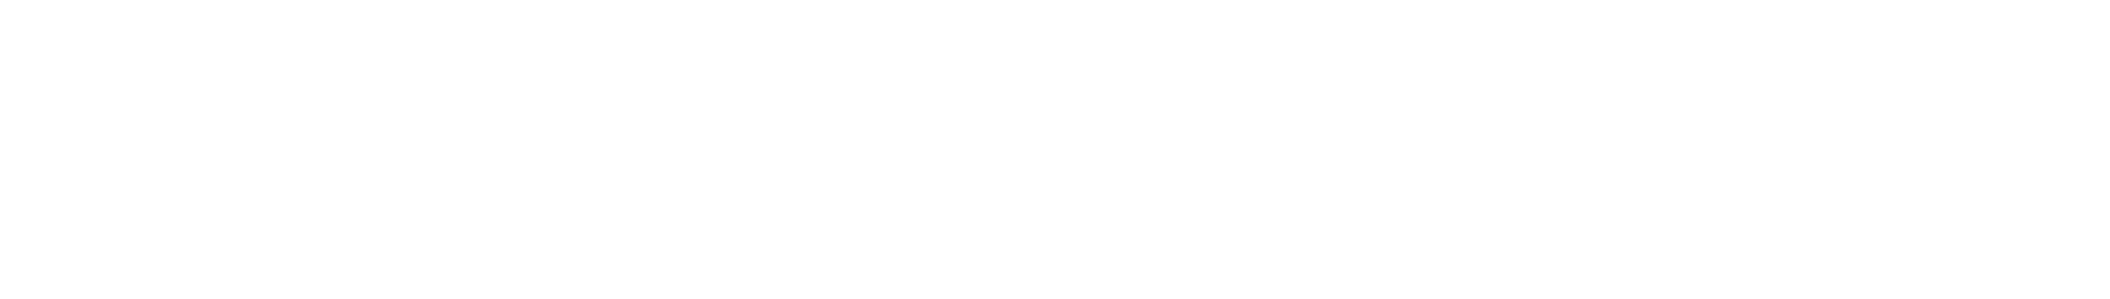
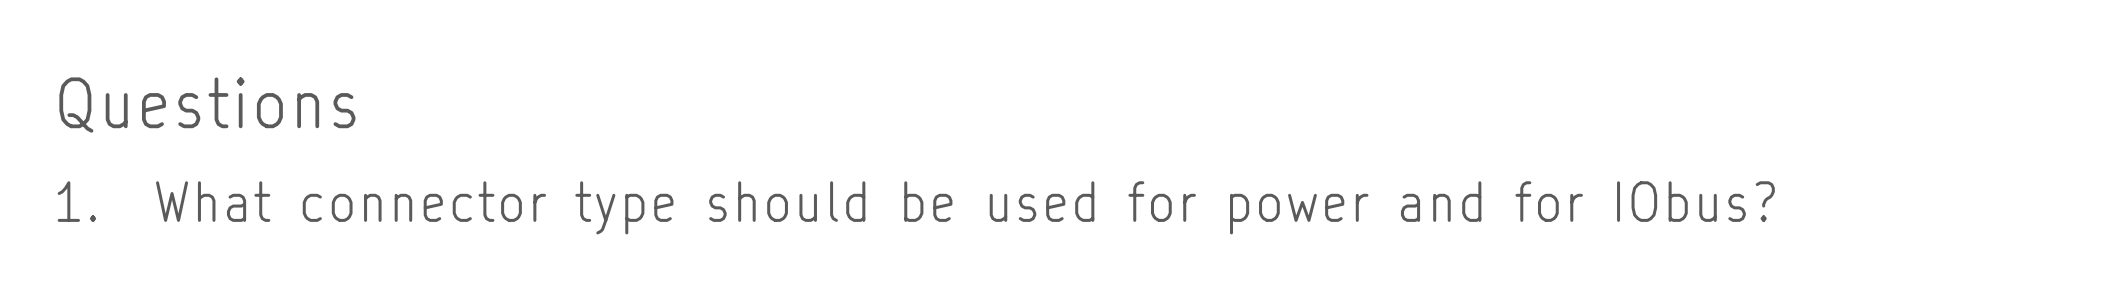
text: none -> Questions (207, 105)
text: none -> 1. What connector type should be used for power and for IObus? (916, 207)

